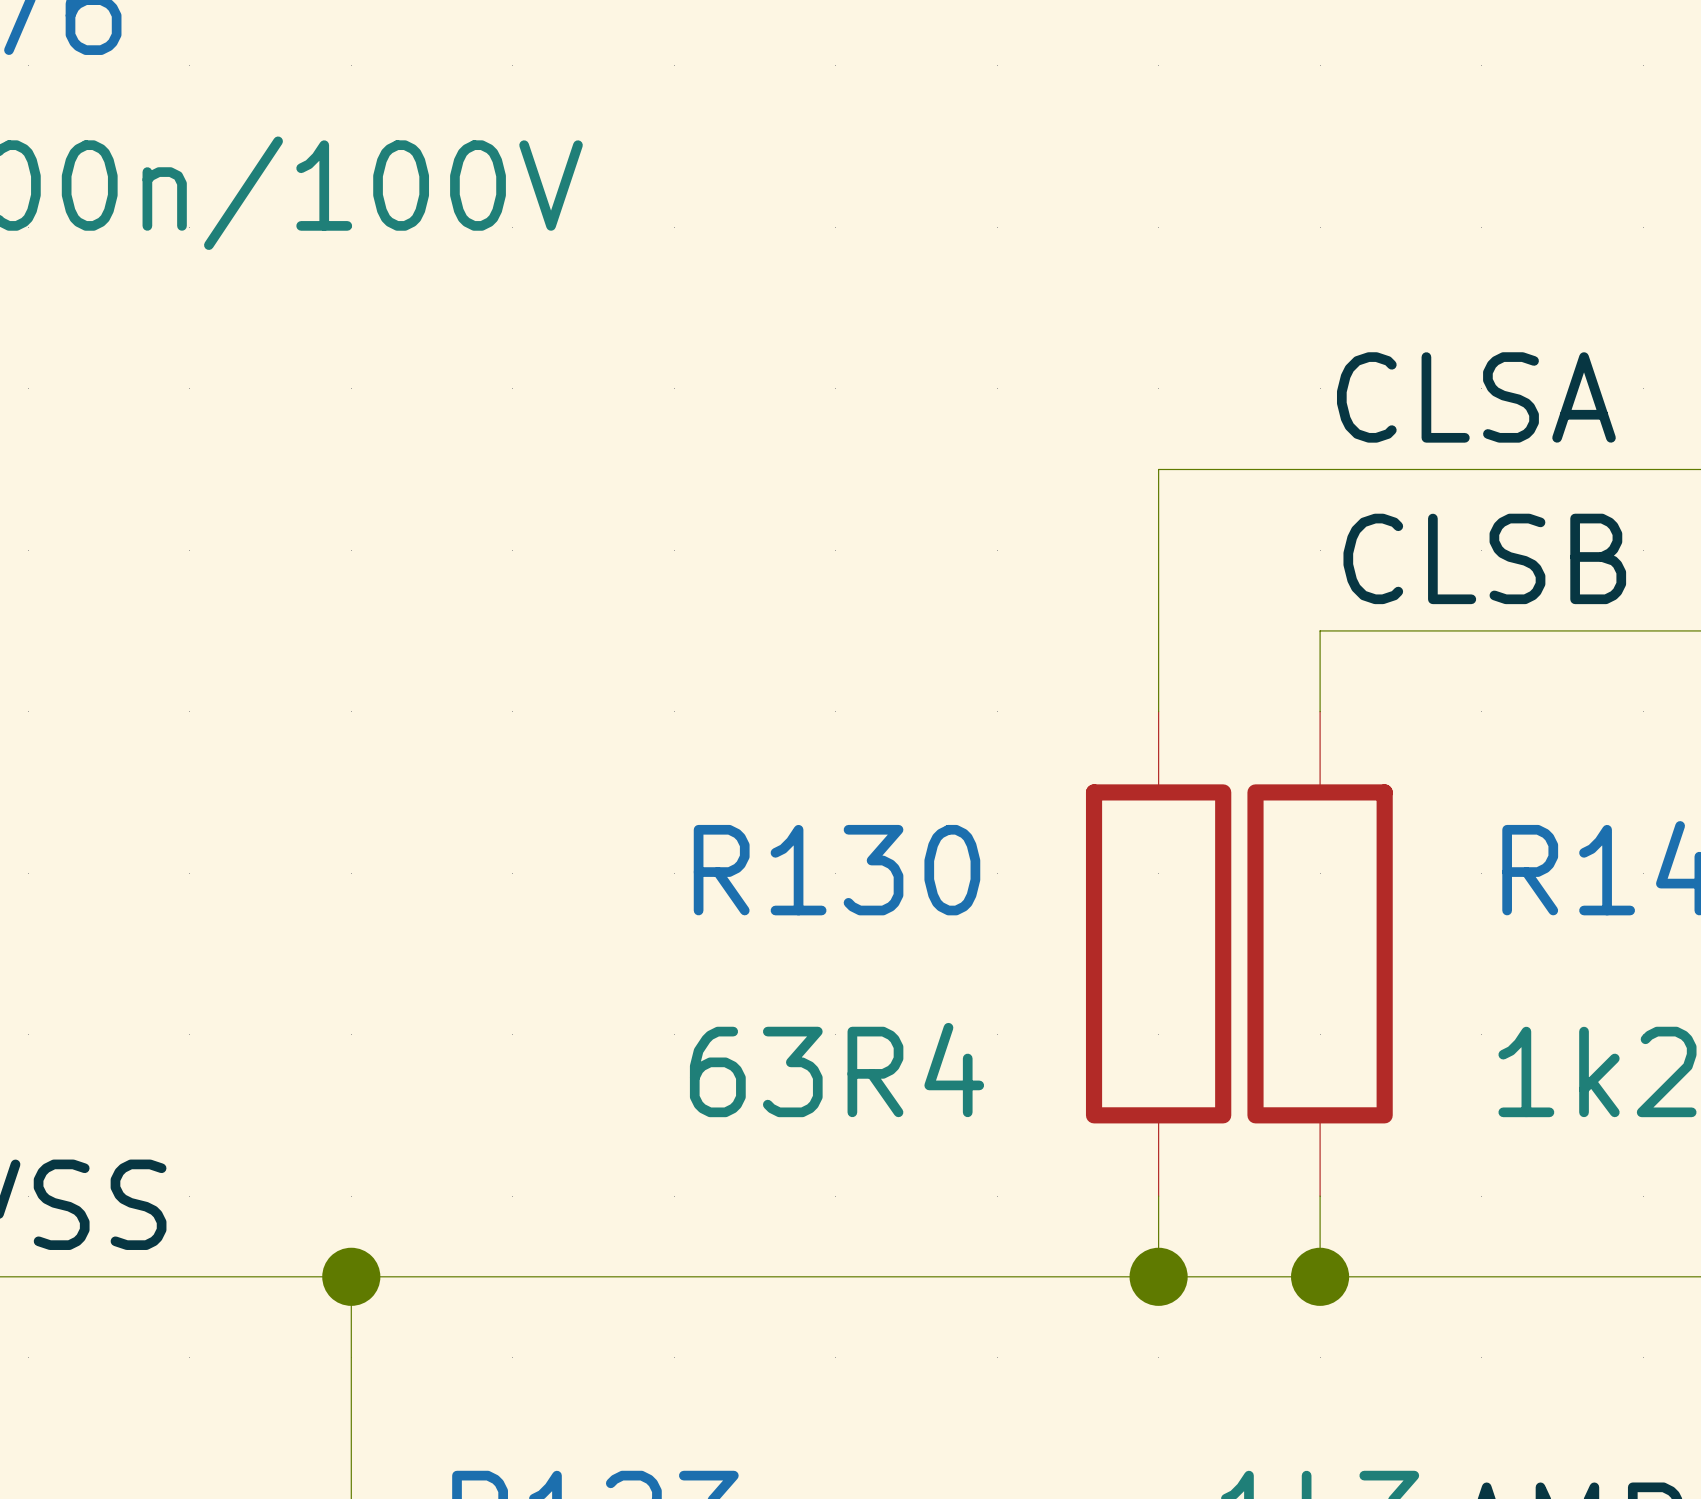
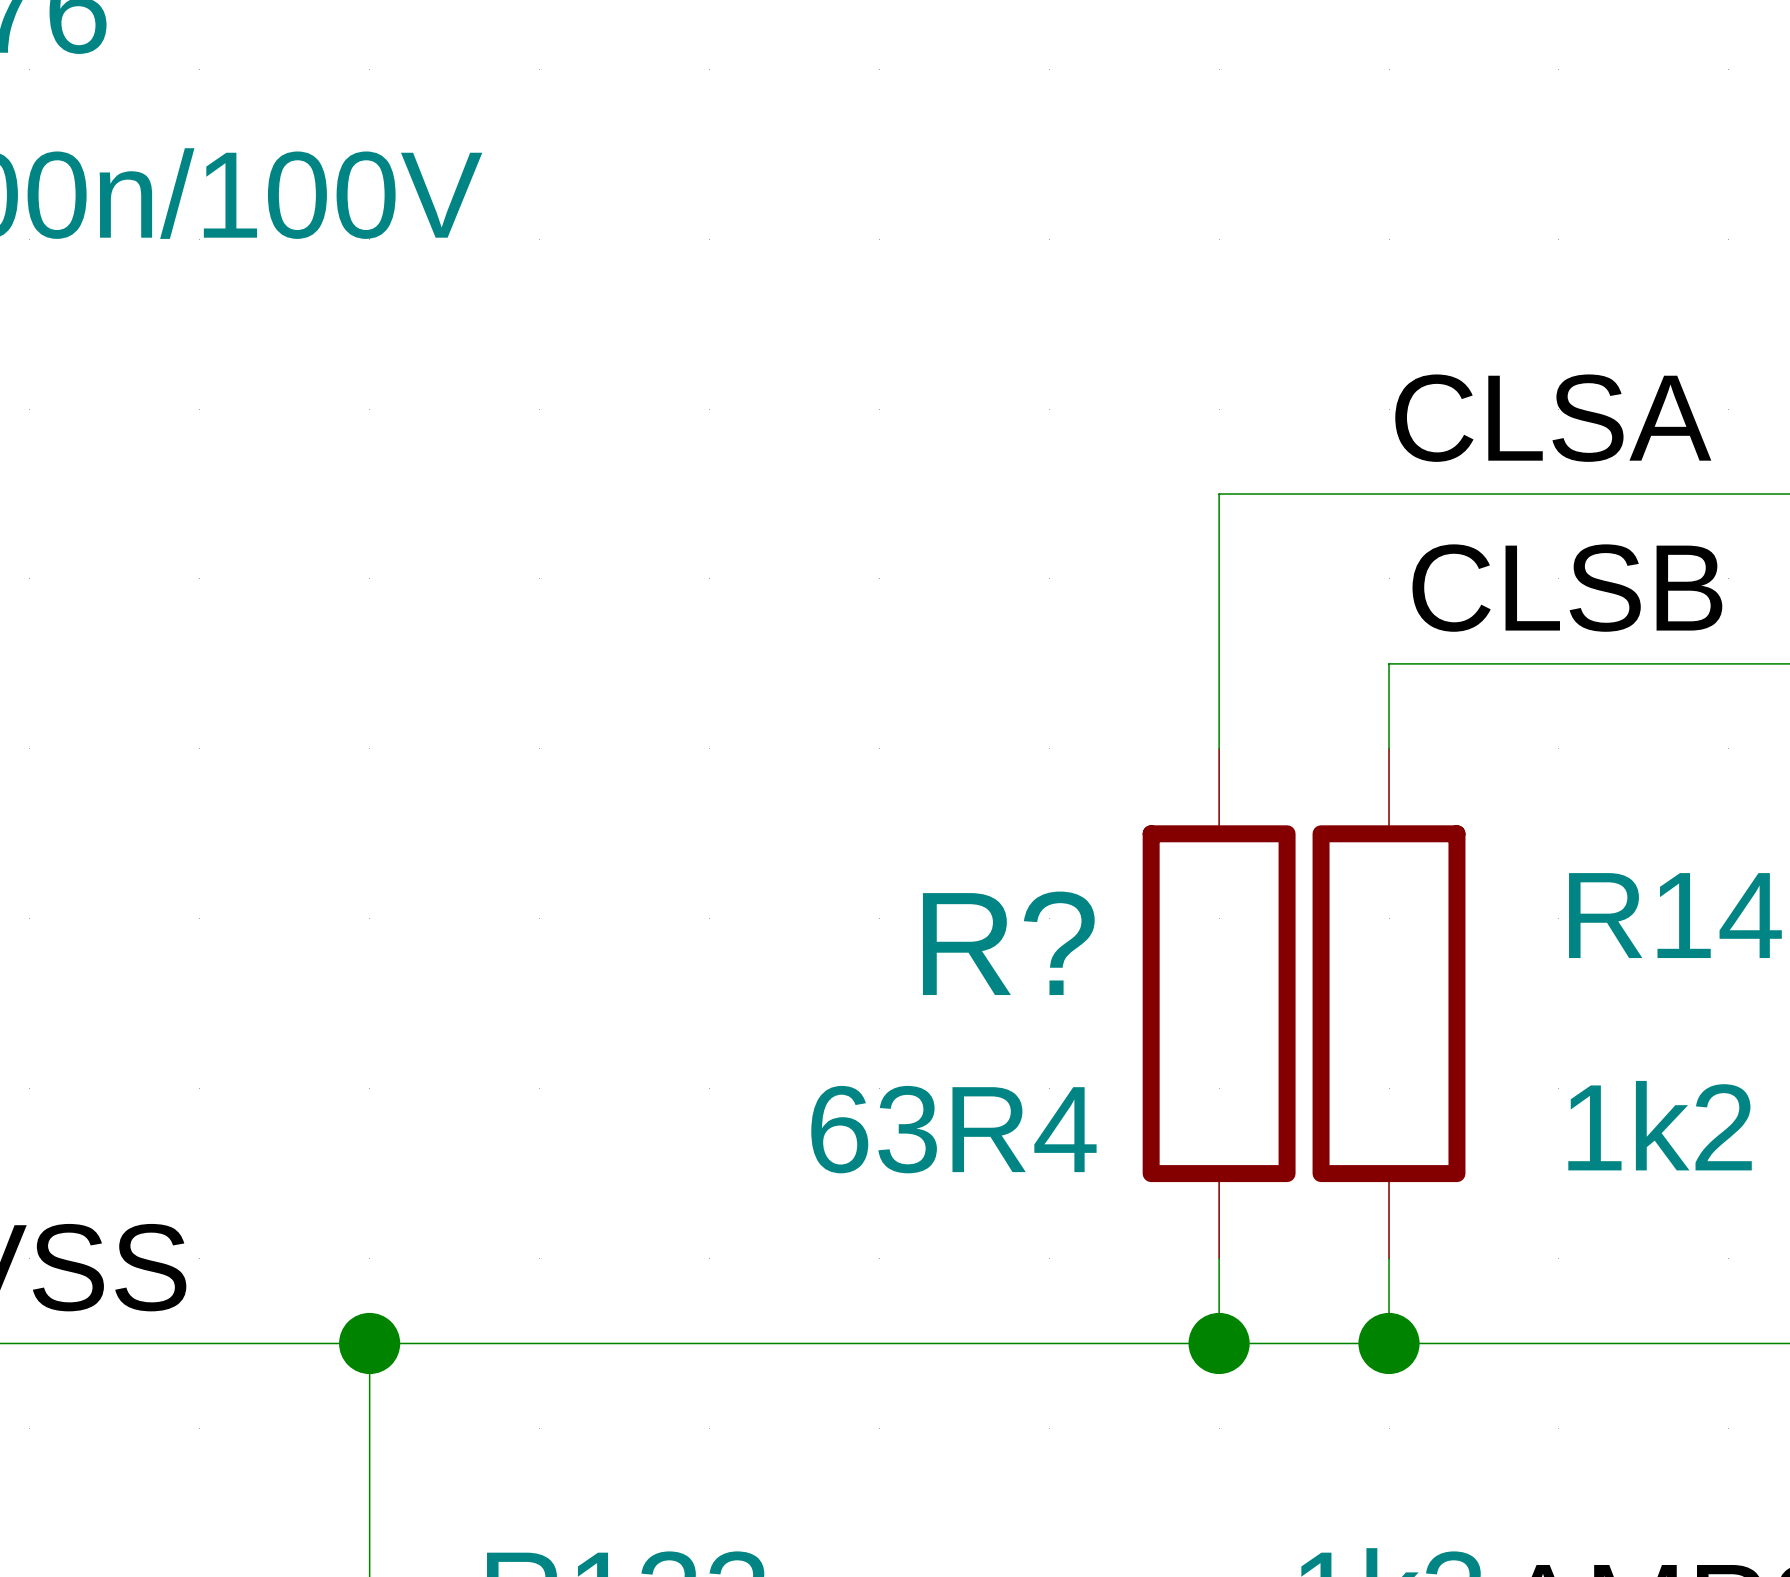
R130 name: R130 (837, 870) -> R? (1008, 943)
R130 text position: 63R4 (837, 1070) -> 63R4 (953, 1129)

